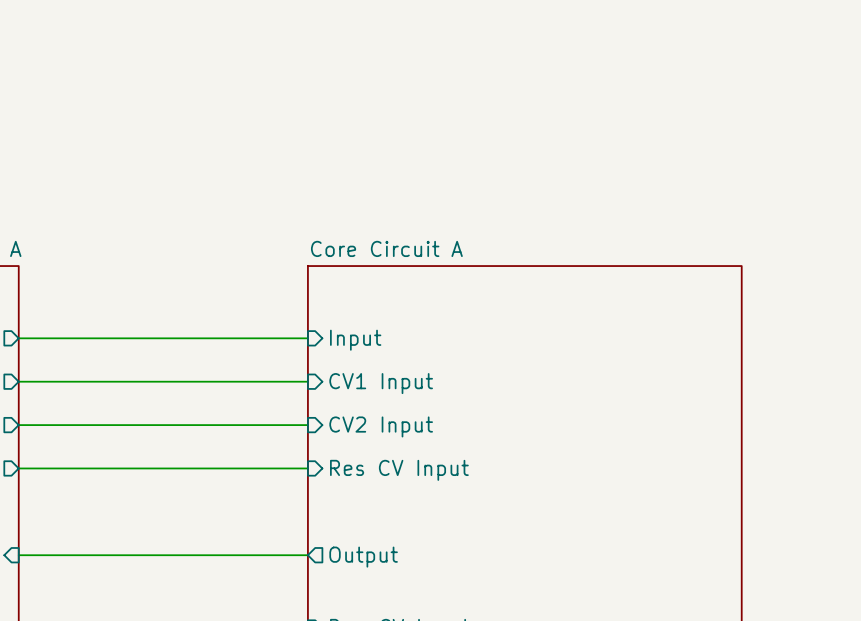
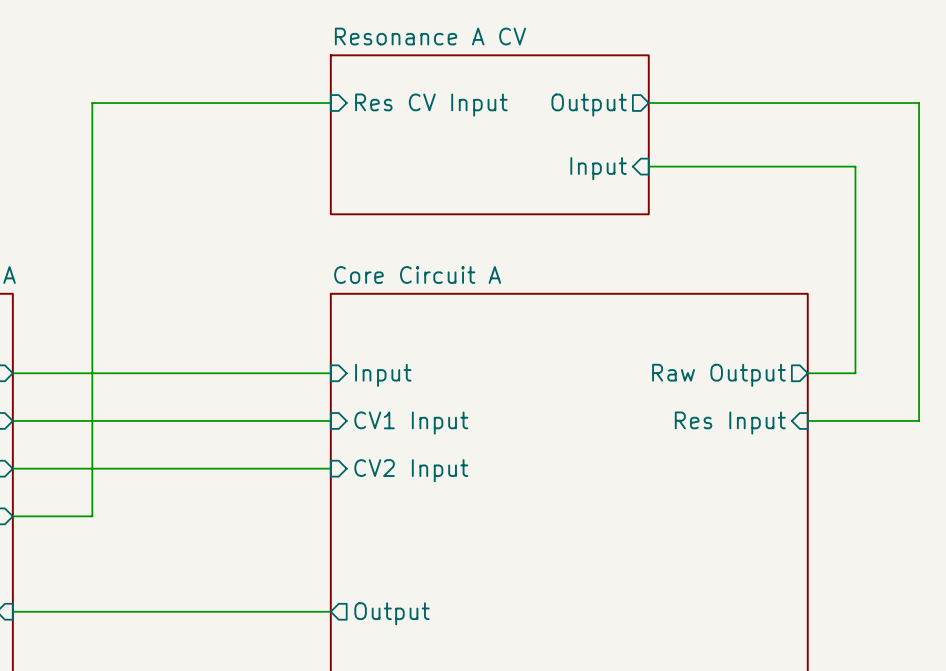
wire: none -> (648, 103) (919, 103) (919, 420) (807, 420)
sheet pin: none -> Res CV Input (431, 105)
sheet pin: none -> Output (589, 105)
sheet Resonance A CV: none -> (489, 134)
wire: none -> (648, 166) (855, 166) (855, 373) (807, 373)
sheet pin: none -> Input (598, 168)
sheet pin: none -> Raw Output (718, 375)
sheet pin: none -> Res Input (730, 423)
wire: (91, 468) (307, 468) -> (92, 516) (92, 103) (330, 103)
sheet pin: Res CV Input (399, 470) -> none

